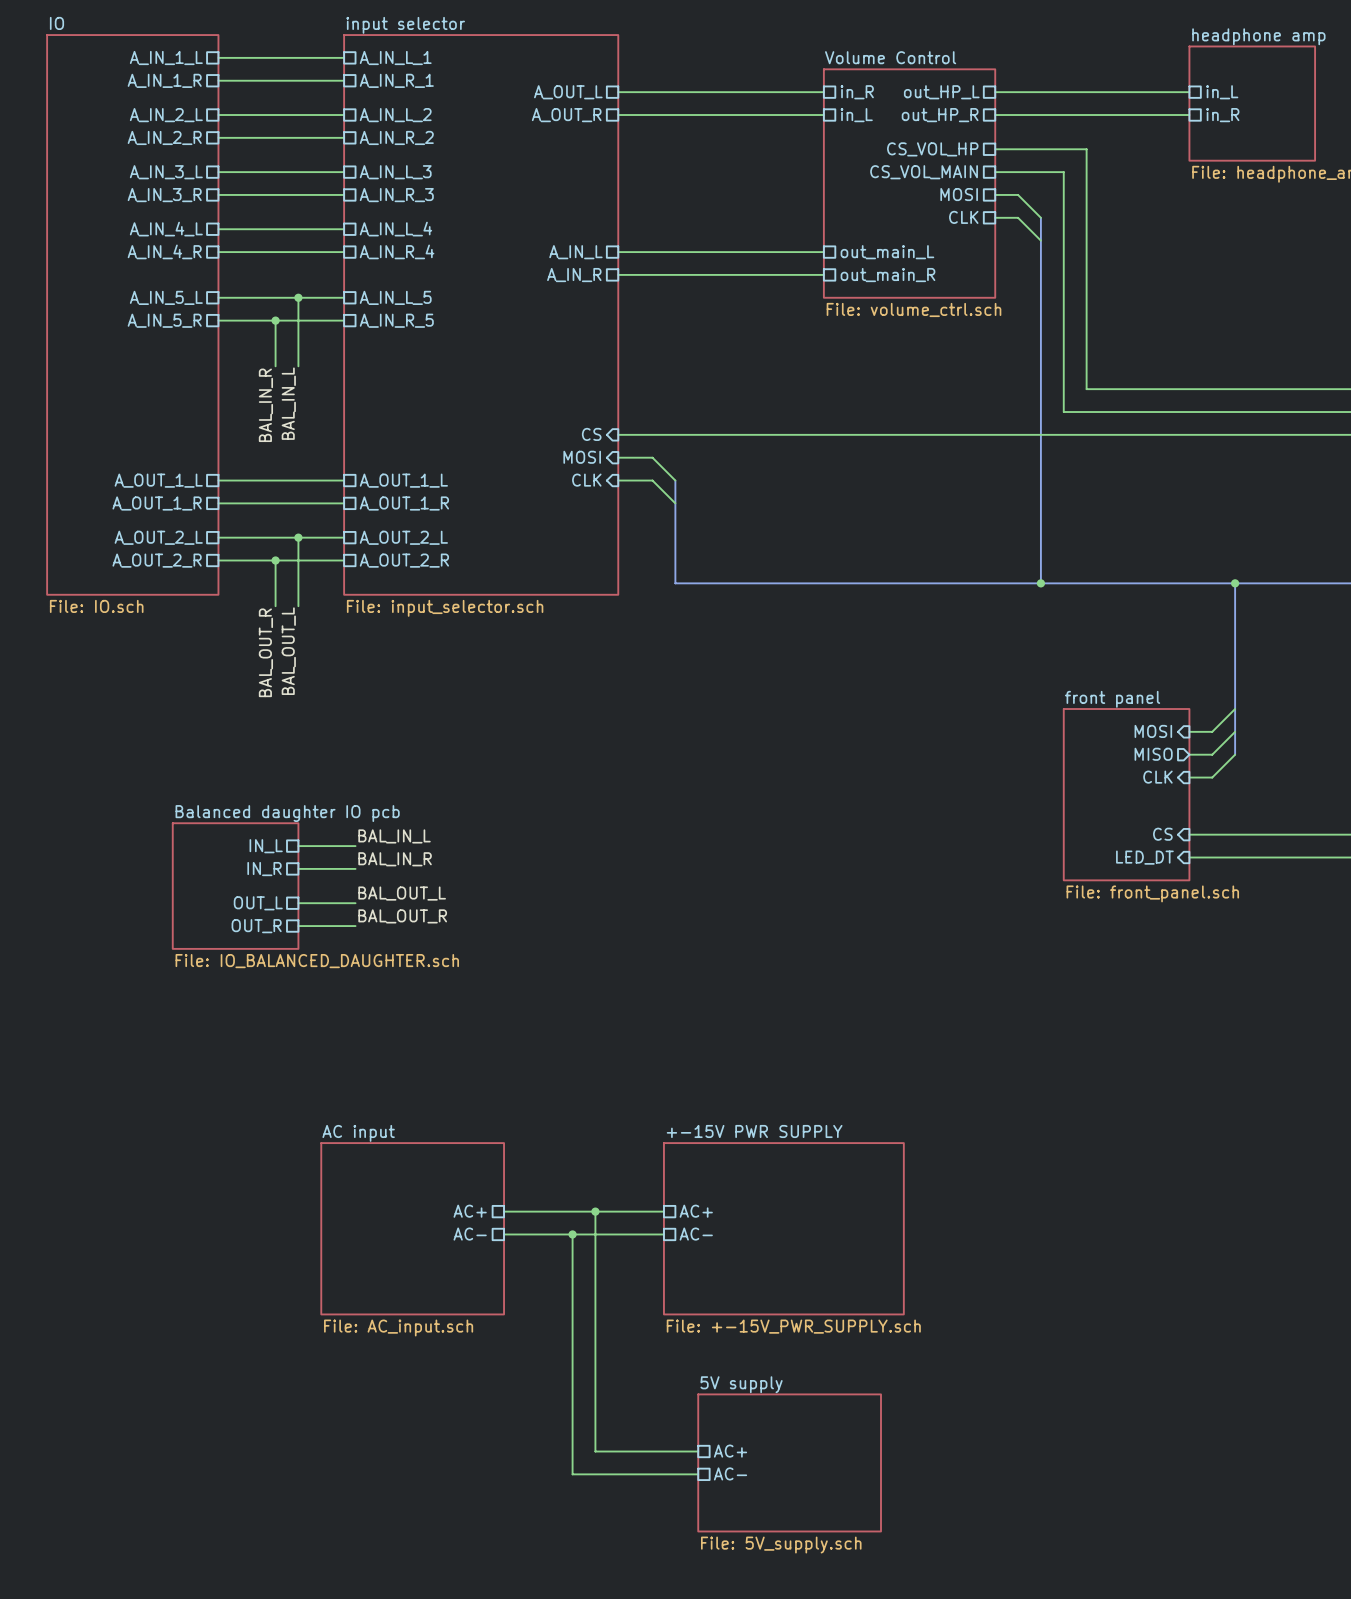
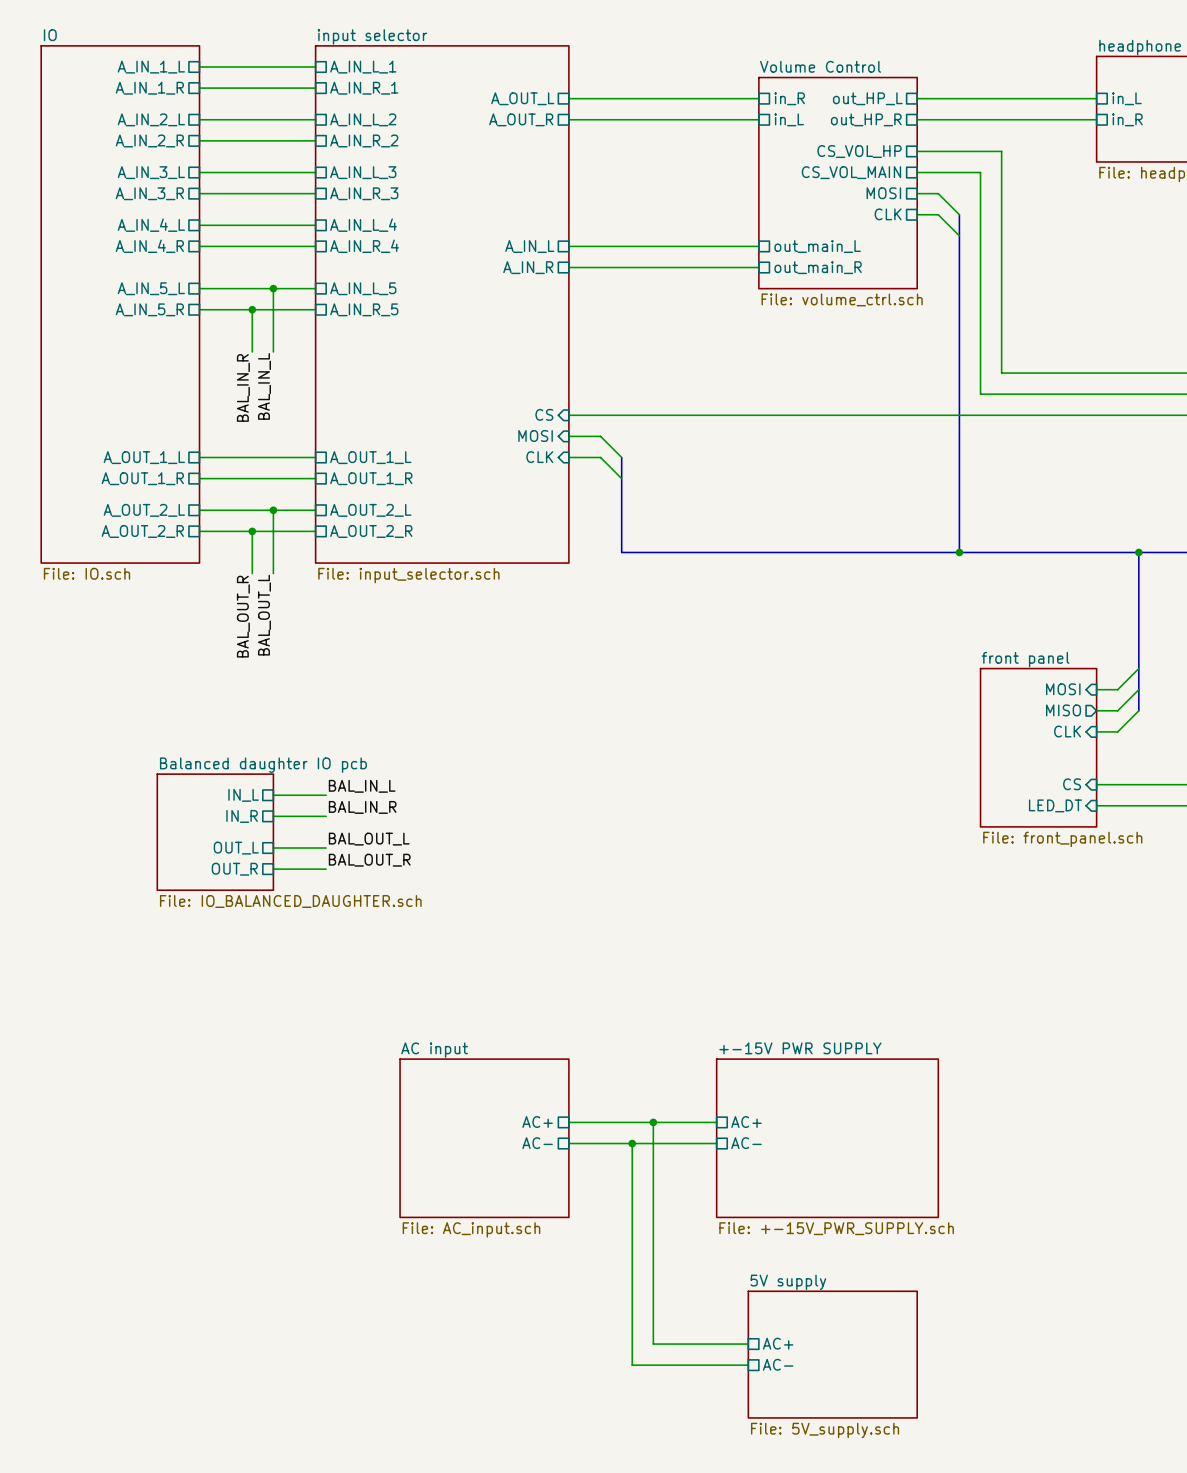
sheet pin: none -> AC+ (537, 1122)
sheet pin: none -> AC+ (746, 1122)
junction: none -> (653, 1122)
sheet pin: AC+ (470, 1211) -> none
wire: (504, 1211) (663, 1211) -> (568, 1122) (716, 1122)
wire: (595, 1211) (595, 1451) (698, 1451) -> (653, 1122) (653, 1344) (748, 1344)
junction: (595, 1211) -> none
sheet pin: AC+ (696, 1211) -> none
sheet pin: none -> AC- (537, 1143)
sheet pin: none -> AC- (746, 1143)
junction: none -> (632, 1143)
sheet AC input position: (412, 1228) -> (484, 1138)
sheet +-15V PWR SUPPLY position: (783, 1228) -> (827, 1138)
sheet pin: AC- (470, 1234) -> none
wire: (504, 1234) (663, 1234) -> (568, 1143) (716, 1143)
wire: (572, 1234) (572, 1474) (698, 1474) -> (632, 1143) (632, 1365) (748, 1365)
junction: (572, 1234) -> none
sheet pin: AC- (696, 1234) -> none
sheet pin position: AC+ (730, 1451) -> AC+ (778, 1343)
sheet 5V supply position: (789, 1462) -> (832, 1354)
sheet pin position: AC- (730, 1473) -> AC- (778, 1364)

